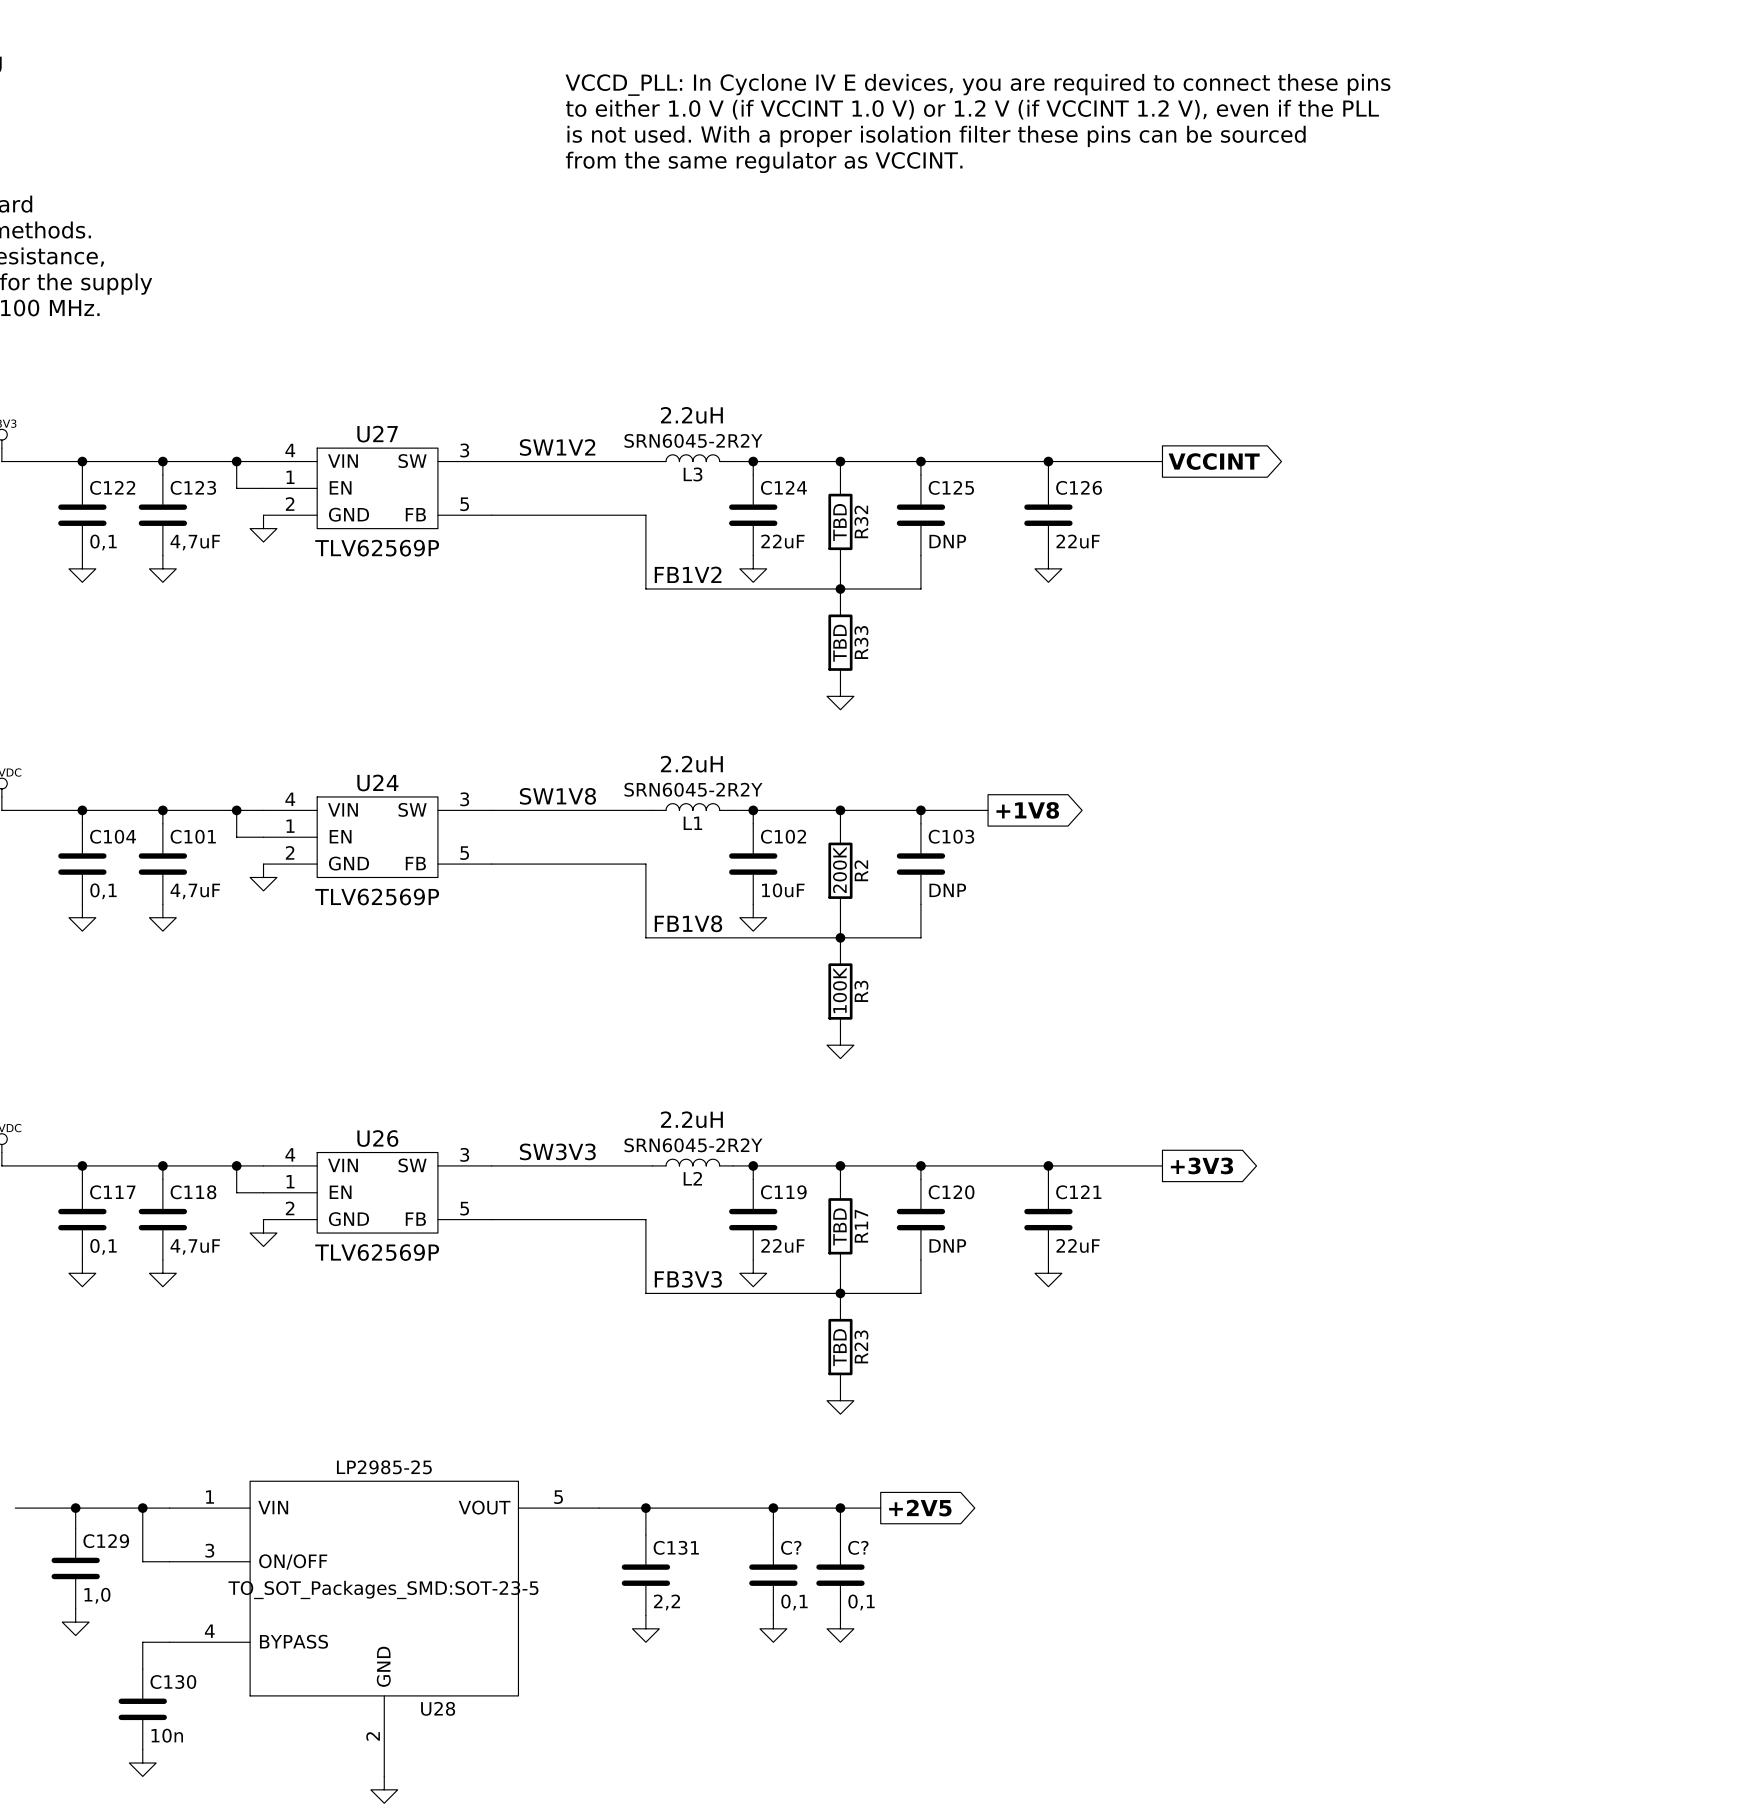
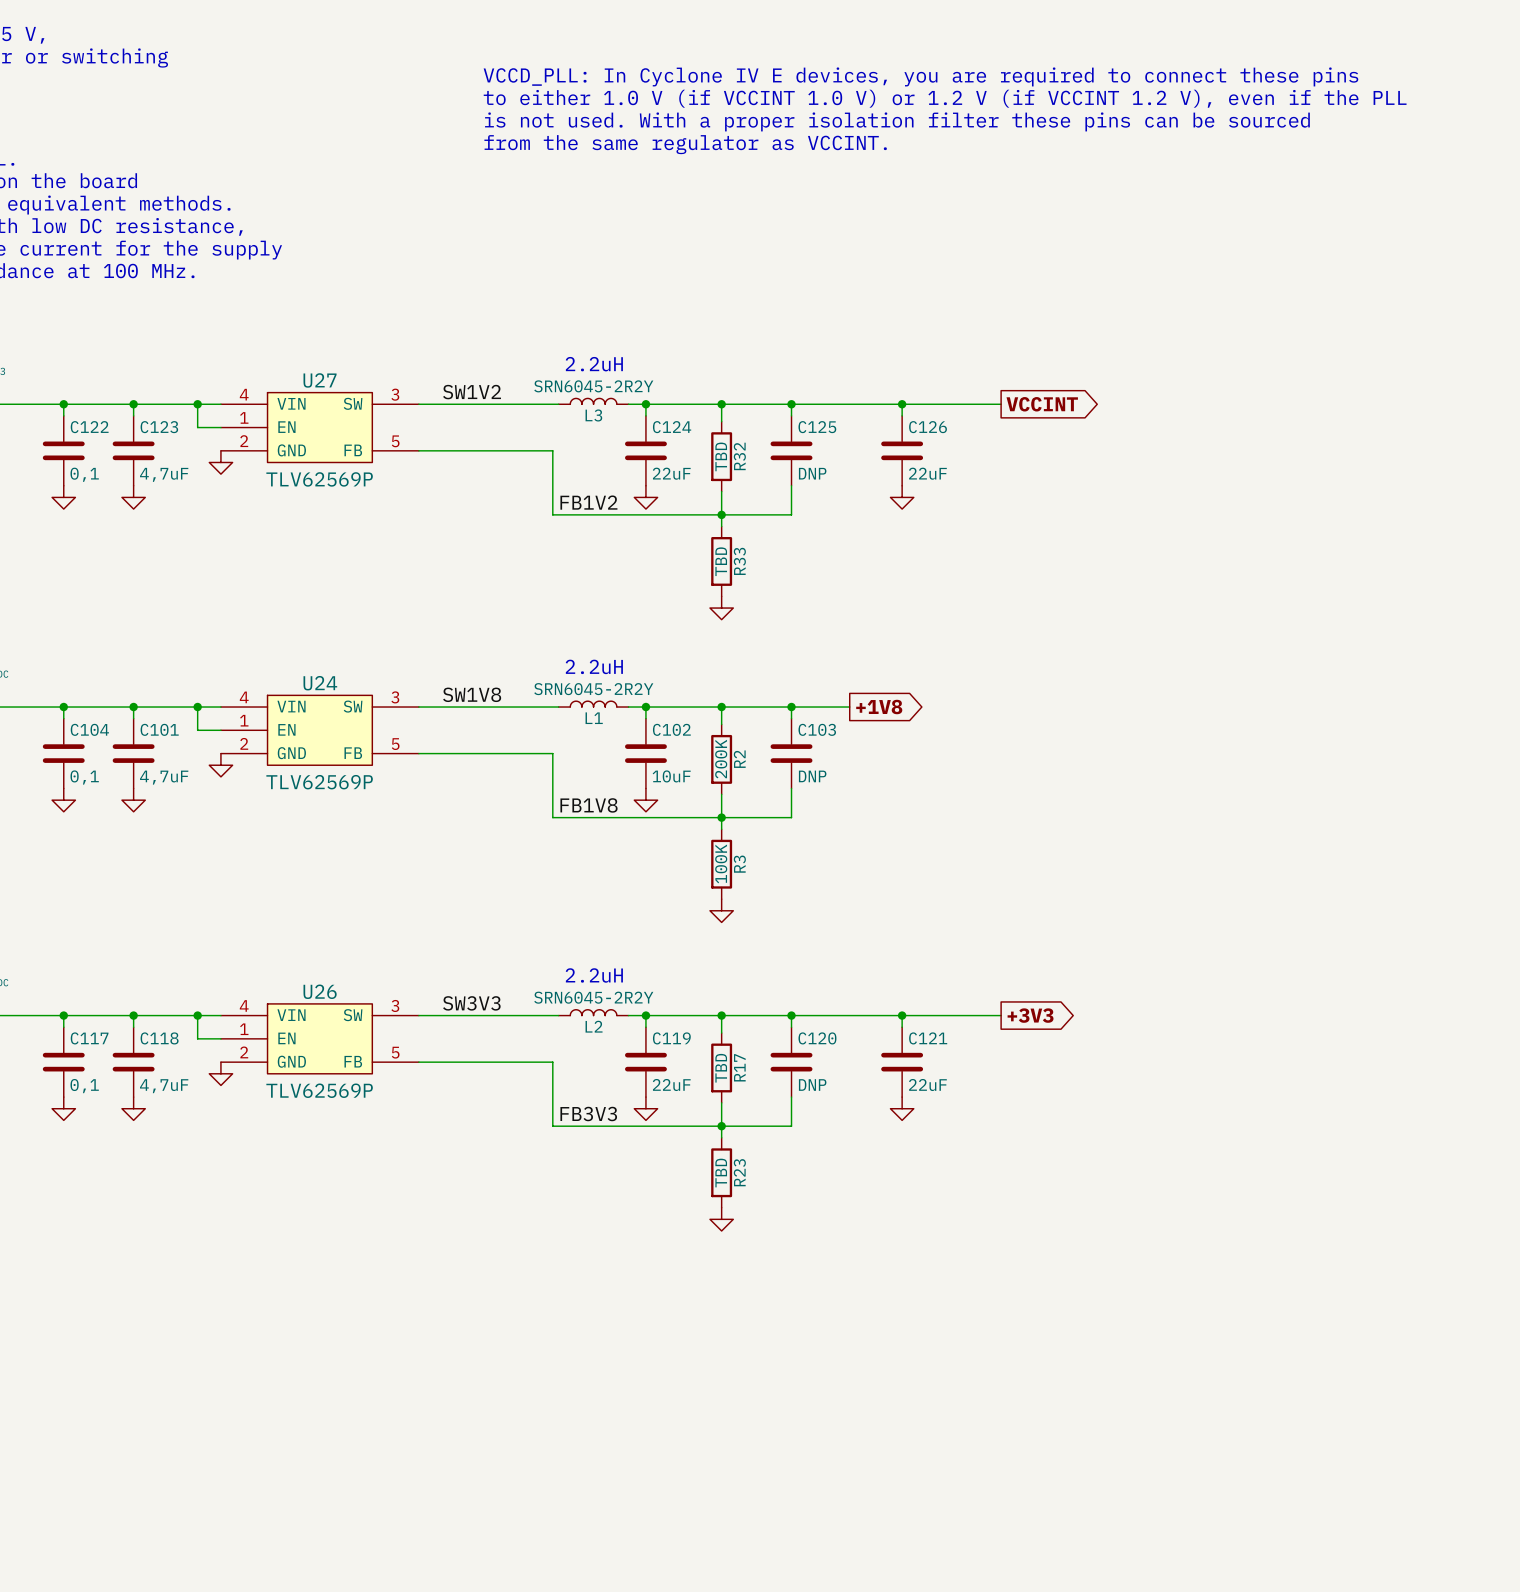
wire: (15, 1508) (169, 1508) -> none
wire: (75, 1508) (75, 1528) -> none
junction: (75, 1508) -> none
wire: (142, 1508) (142, 1561) (169, 1561) -> none
junction: (142, 1508) -> none
wire: (598, 1508) (880, 1508) -> none
wire: (645, 1508) (645, 1534) -> none
junction: (645, 1508) -> none
wire: (773, 1508) (773, 1534) -> none
junction: (773, 1508) -> none
wire: (840, 1508) (840, 1534) -> none
junction: (840, 1508) -> none
global label: +2V5 (920, 1508) -> none
C129: 1,0 (75, 1568) -> none
C131: 2,2 (645, 1575) -> none
C?: 0,1 (773, 1575) -> none
C?: 0,1 (840, 1575) -> none
power symbol: (75, 1622) -> none
U28: LP2985-25 (384, 1628) -> none
power symbol: (645, 1628) -> none
power symbol: (773, 1628) -> none
power symbol: (840, 1628) -> none
wire: (169, 1642) (142, 1642) (142, 1669) -> none
C130: 10n (142, 1709) -> none
power symbol: (142, 1763) -> none
power symbol: (384, 1789) -> none

